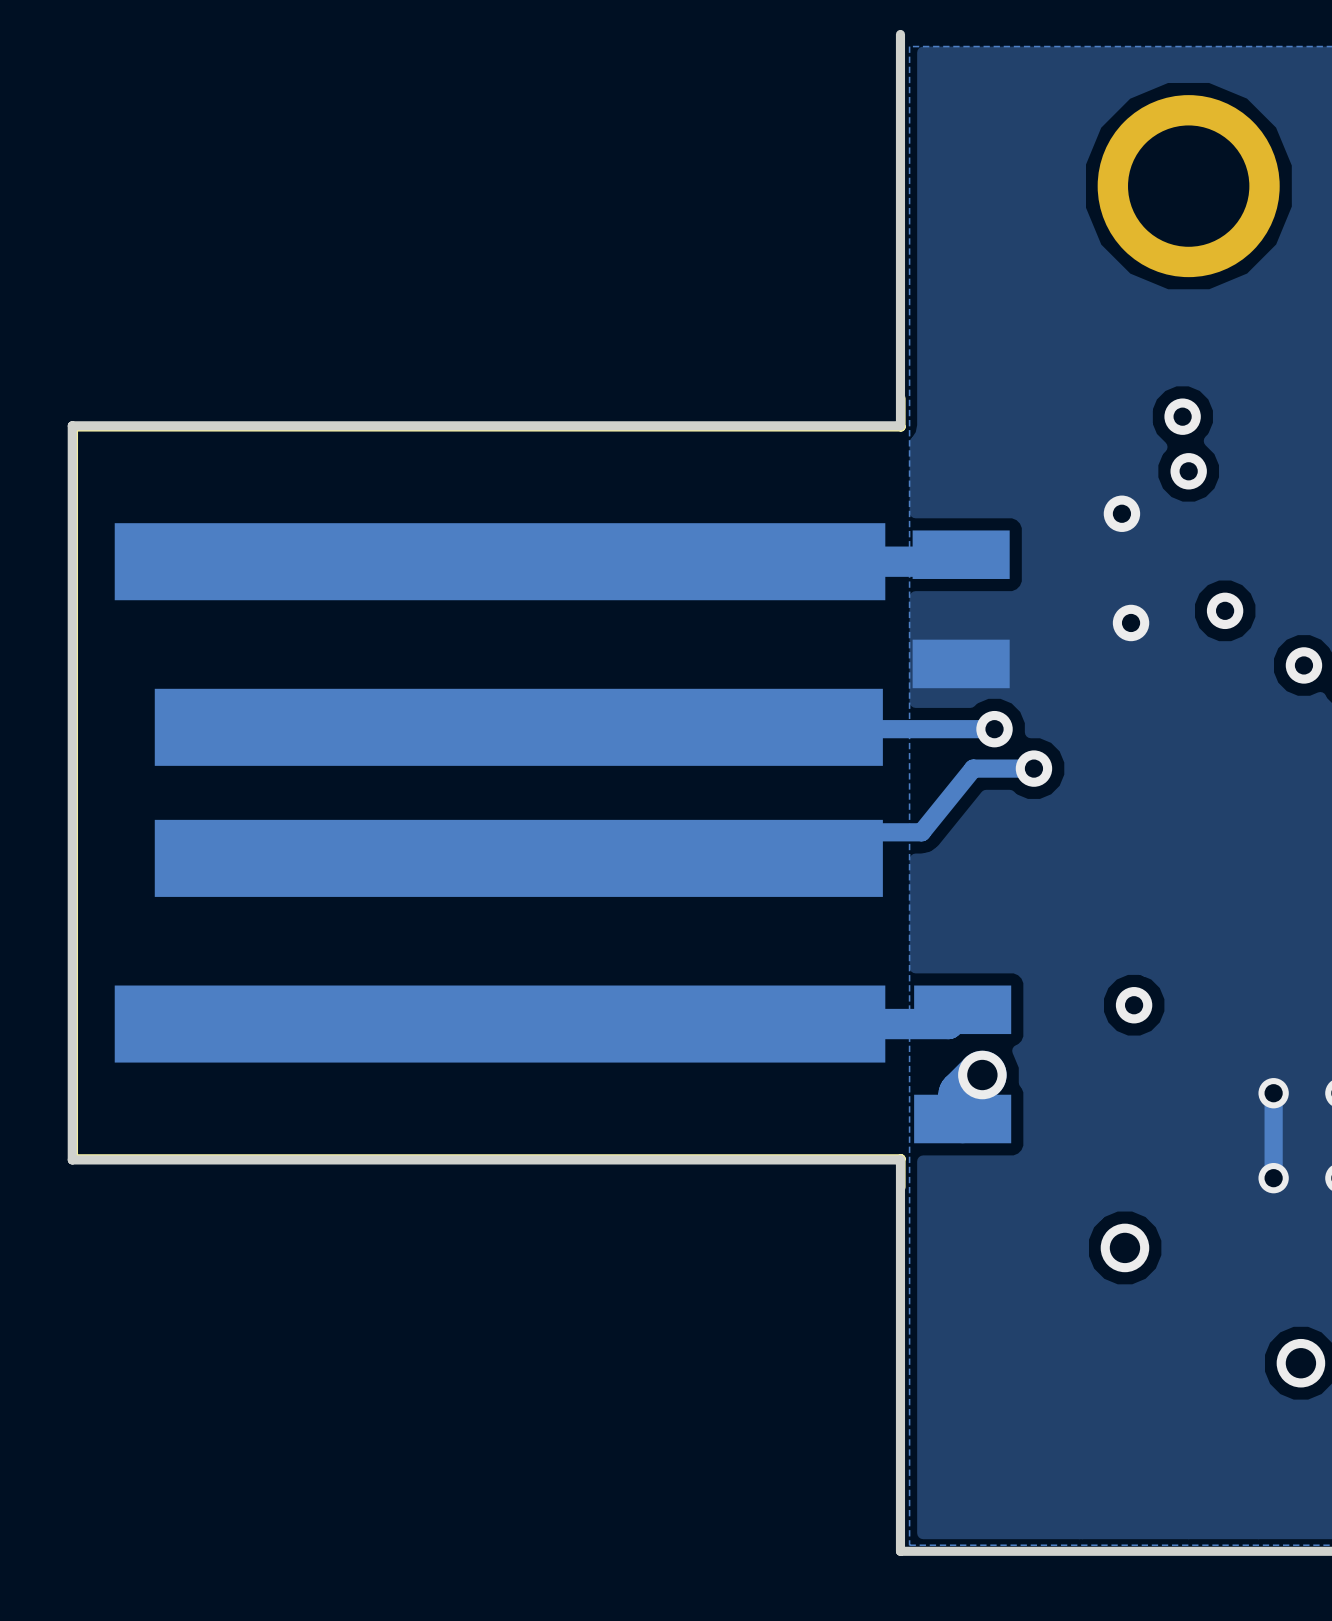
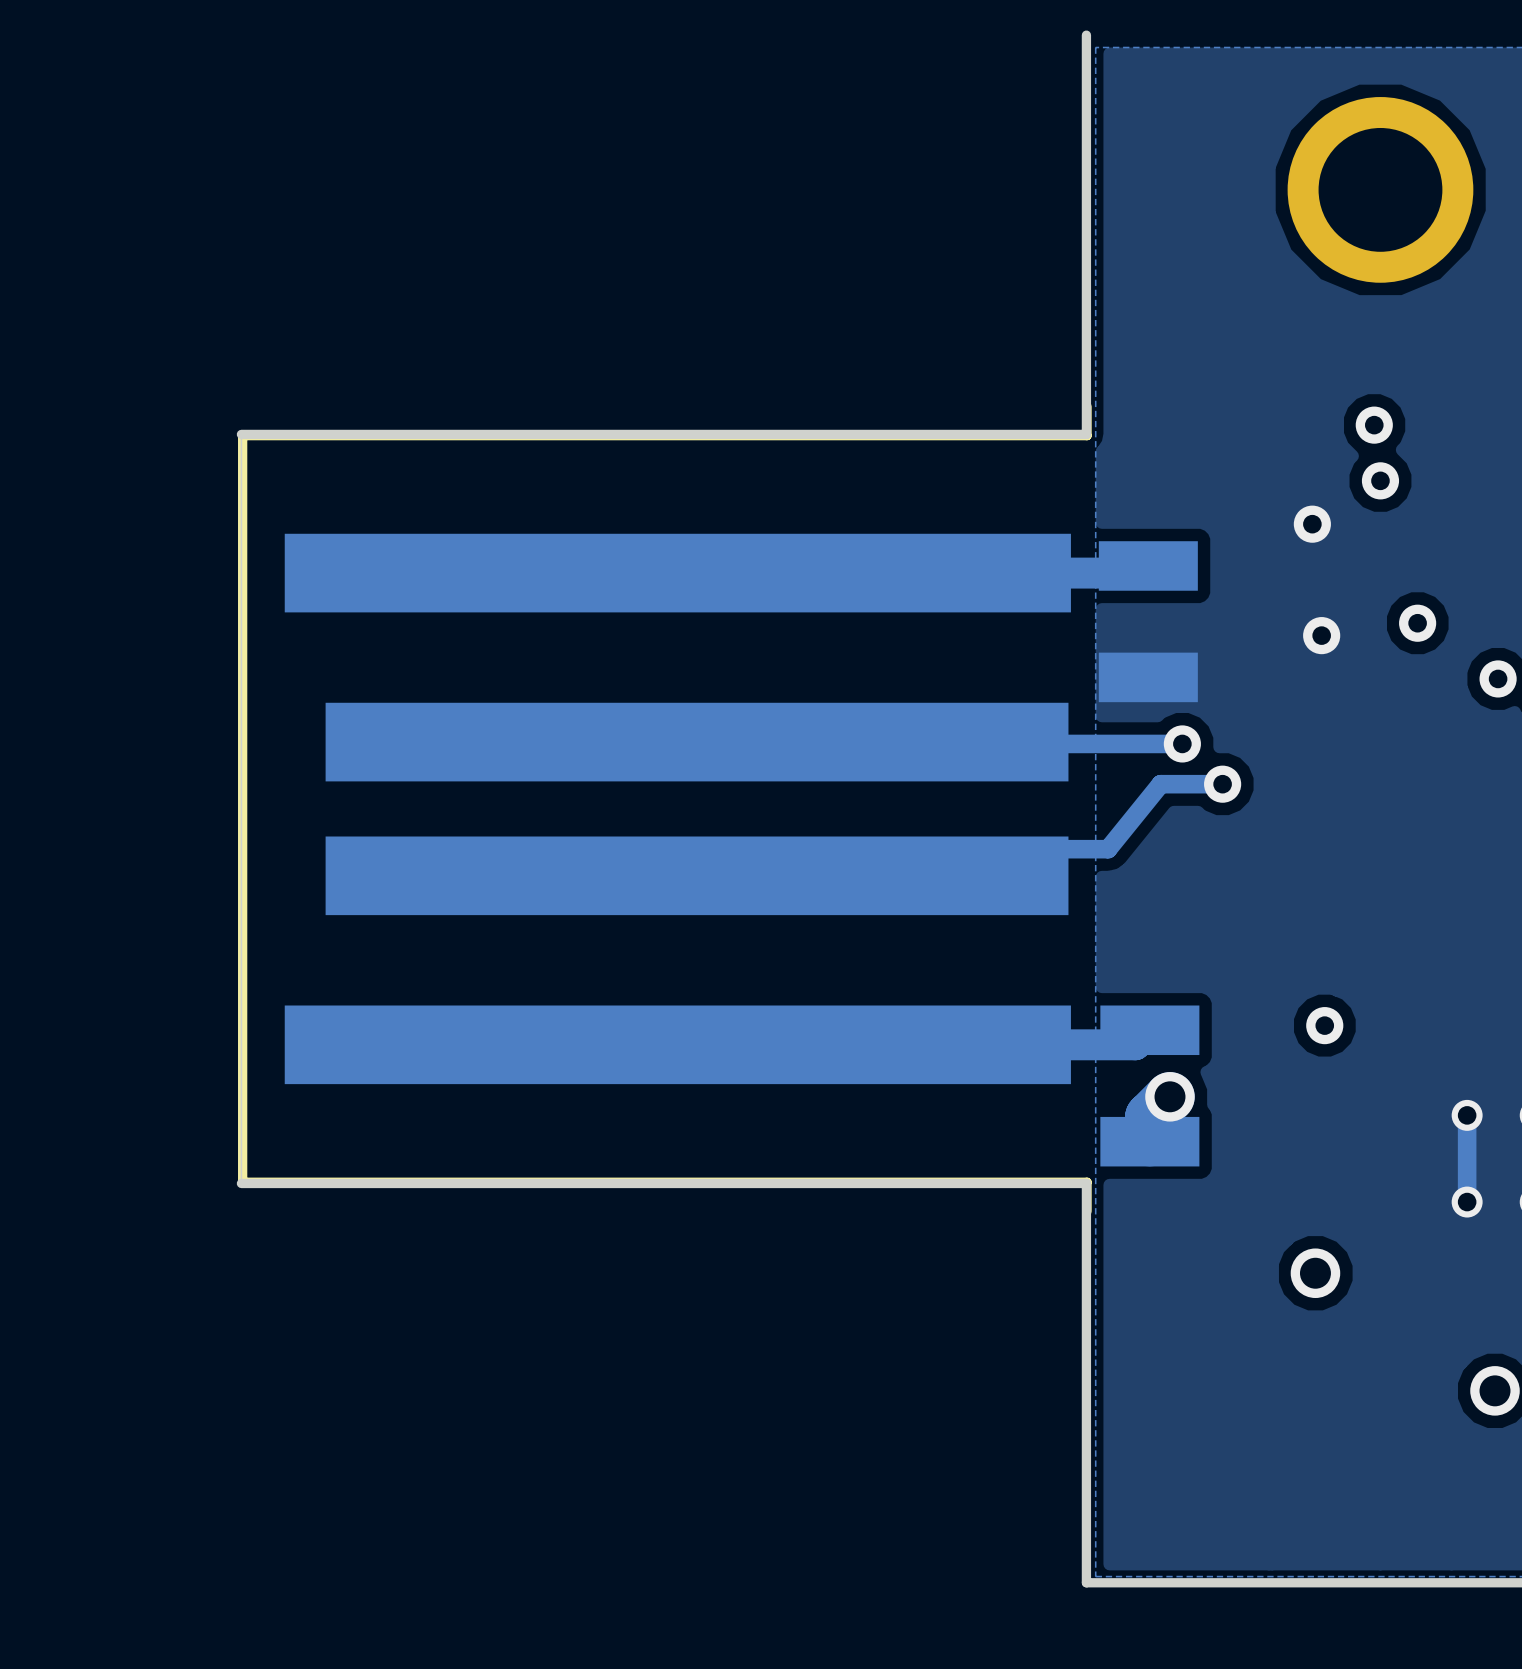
board edge width: thick (72, 425) (72, 1159) -> thin (241, 434) (241, 1183)

